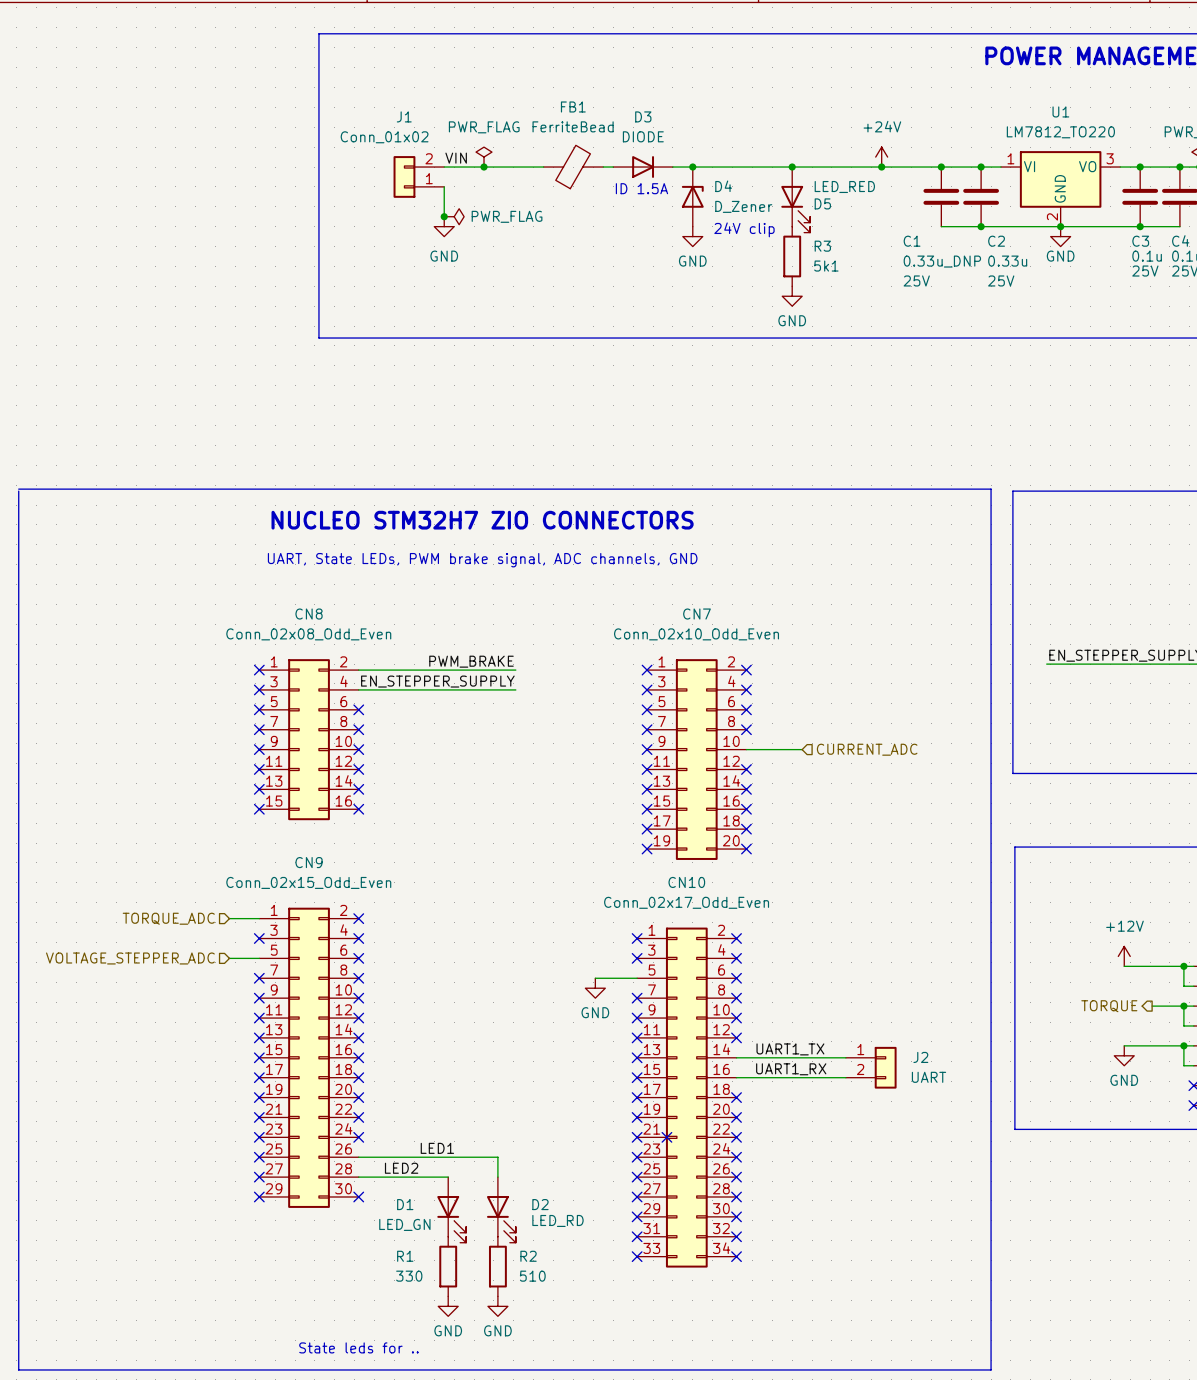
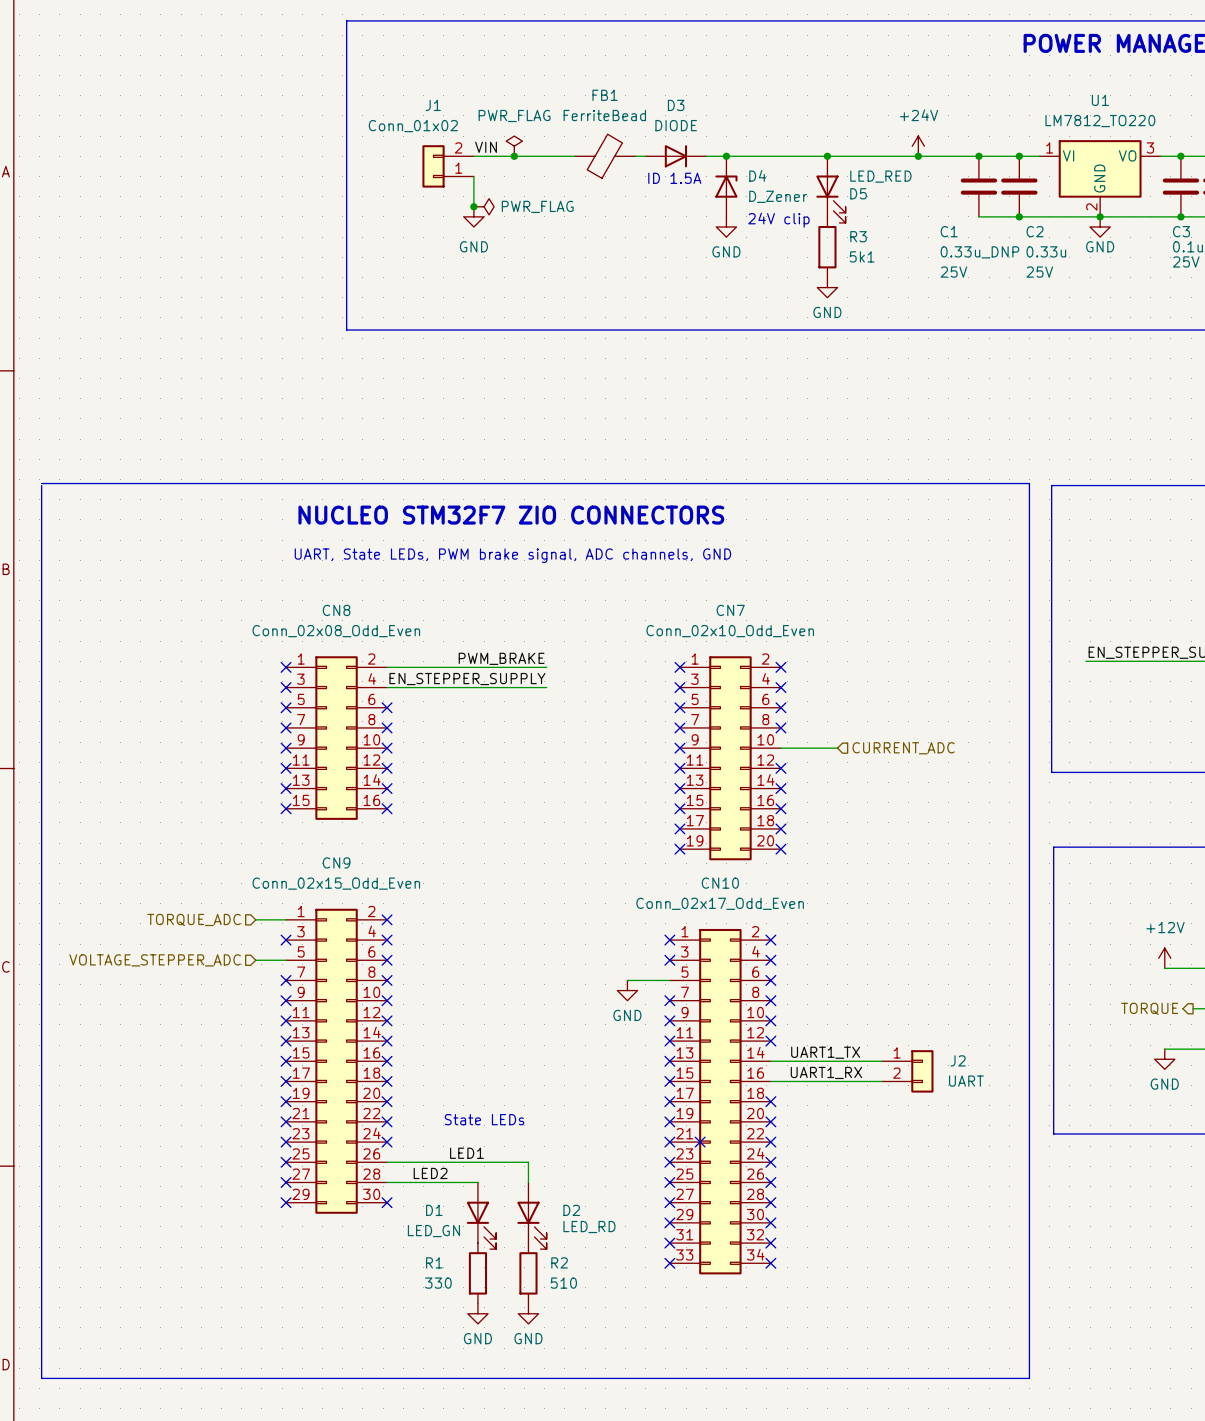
text: NUCLEO STM32H7 ZIO CONNECTORS (482, 520) -> NUCLEO STM32F7 ZIO CONNECTORS (511, 515)
text: none -> State LEDs (484, 1119)
text: State leds for .. (358, 1347) -> none

